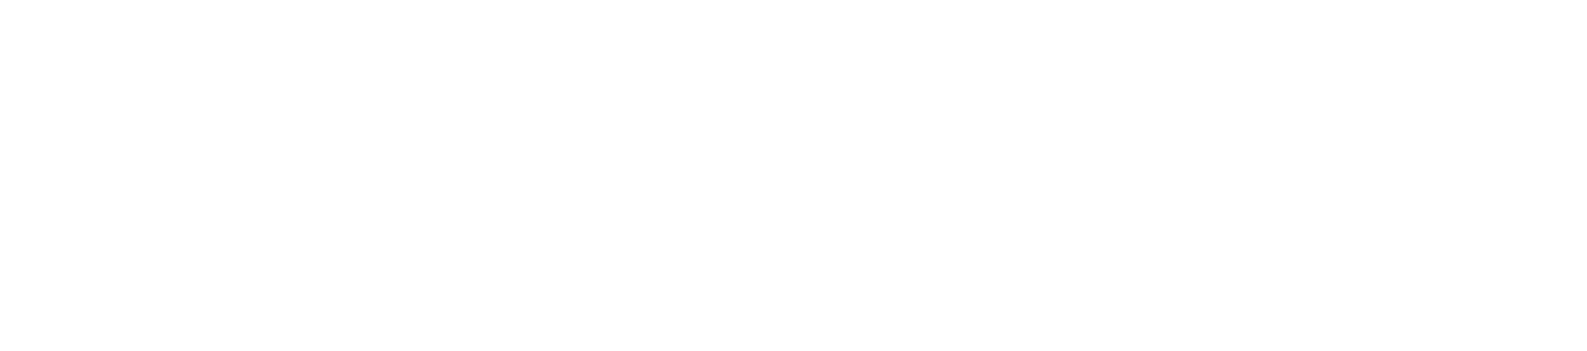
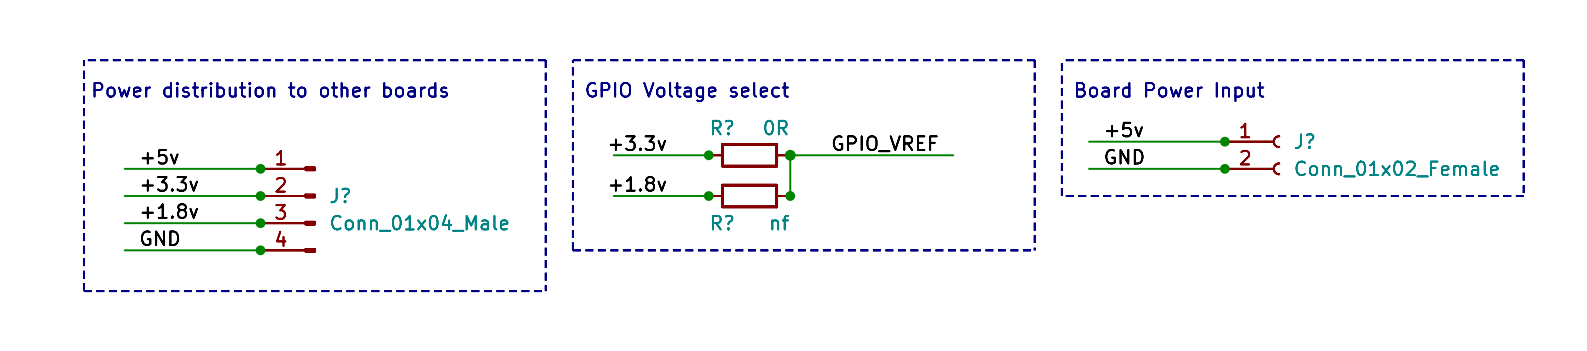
line: none -> (83, 60) (83, 291) (545, 291) (545, 60) (83, 60)
line: none -> (572, 60) (1034, 60) (1034, 250) (572, 250) (572, 60)
line: none -> (1061, 60) (1523, 60) (1523, 196) (1061, 196) (1061, 60)
text: none -> Power distribution to other boards (270, 89)
text: none -> GPIO Voltage select (687, 92)
text: none -> Board Power Input (1170, 92)
label: none -> +5v (1124, 129)
wire: none -> (1089, 141) (1224, 141)
junction: none -> (1224, 141)
label: none -> +3.3v (637, 143)
label: none -> GPIO_VREF (885, 143)
wire: none -> (613, 155) (708, 155)
junction: none -> (708, 155)
R?: none -> 0R (749, 155)
junction: none -> (790, 155)
wire: none -> (953, 155) (790, 155) (790, 196)
J?: none -> Conn_01x02_Female (1252, 155)
label: none -> +5v (160, 156)
label: none -> GND (1124, 156)
wire: none -> (124, 168) (260, 168)
junction: none -> (260, 168)
wire: none -> (1089, 168) (1224, 168)
junction: none -> (1224, 168)
label: none -> +3.3v (169, 183)
label: none -> +1.8v (637, 183)
wire: none -> (124, 196) (260, 196)
junction: none -> (260, 196)
wire: none -> (613, 196) (708, 196)
junction: none -> (708, 196)
R?: none -> nf (749, 196)
junction: none -> (790, 196)
J?: none -> Conn_01x04_Male (288, 209)
label: none -> +1.8v (169, 211)
wire: none -> (124, 223) (260, 223)
junction: none -> (260, 223)
label: none -> GND (160, 238)
wire: none -> (124, 250) (260, 250)
junction: none -> (260, 250)

